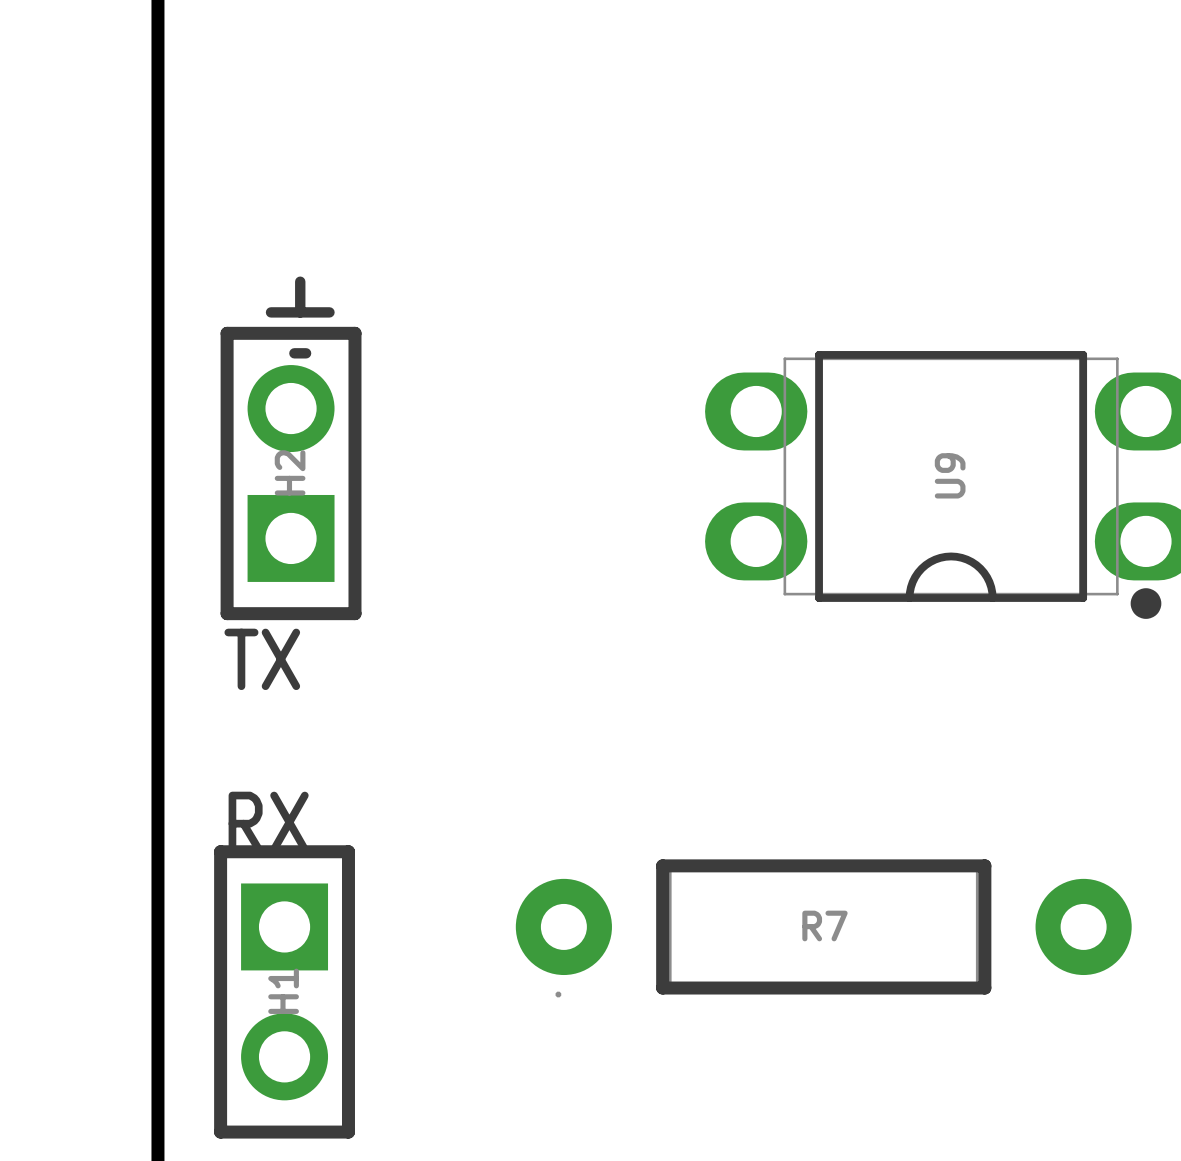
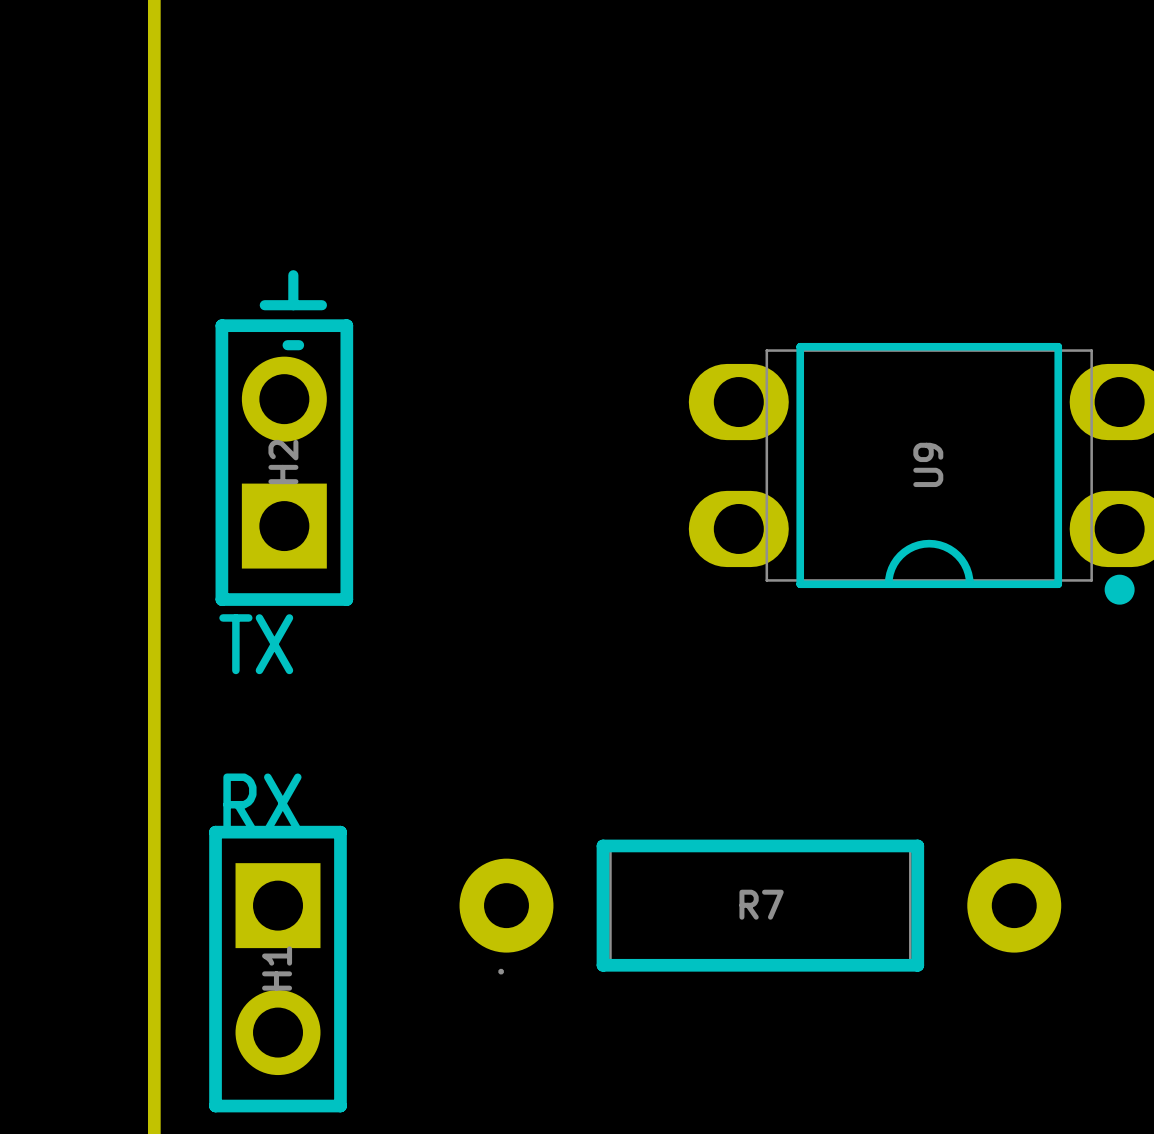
R7 position: (823, 928) -> (760, 907)

